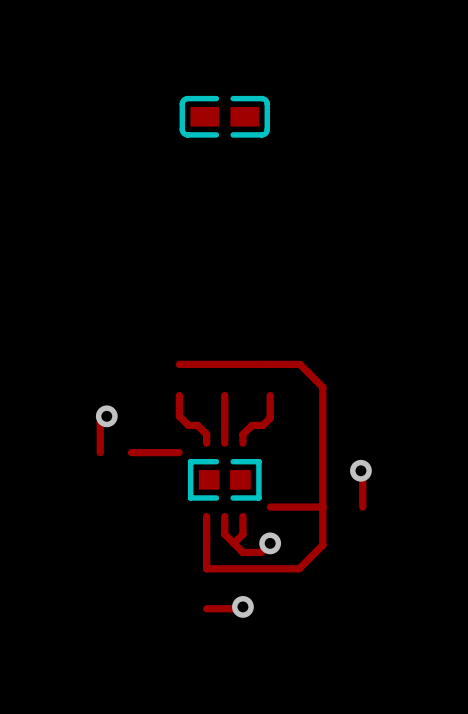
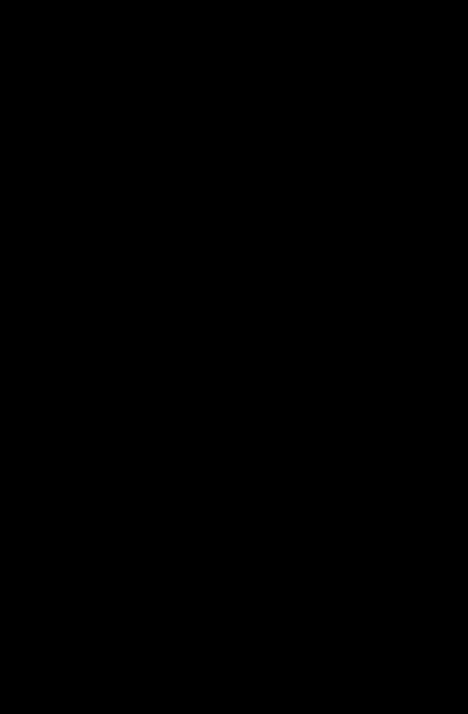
part: (224, 116) -> none
track: (179, 364) (299, 364) (322, 387) (322, 545) (299, 568) (206, 568) (206, 516) -> none
track: (179, 395) (179, 416) (188, 425) (197, 425) (206, 434) (206, 443) -> none
track: (224, 395) (224, 443) -> none
track: (270, 395) (270, 418) (262, 425) (252, 425) (242, 434) (242, 443) -> none
track: (106, 416) (100, 422) (100, 452) -> none
via: (106, 416) -> none
track: (131, 452) (179, 452) -> none
track: (360, 470) (362, 472) (362, 507) -> none
via: (360, 470) -> none
part: (224, 479) -> none
track: (270, 507) (322, 507) -> none
track: (224, 516) (224, 534) (242, 552) (261, 552) (270, 543) -> none
track: (242, 516) (242, 534) (233, 543) -> none
via: (270, 543) -> none
track: (242, 606) (241, 608) (206, 608) -> none
via: (242, 606) -> none

